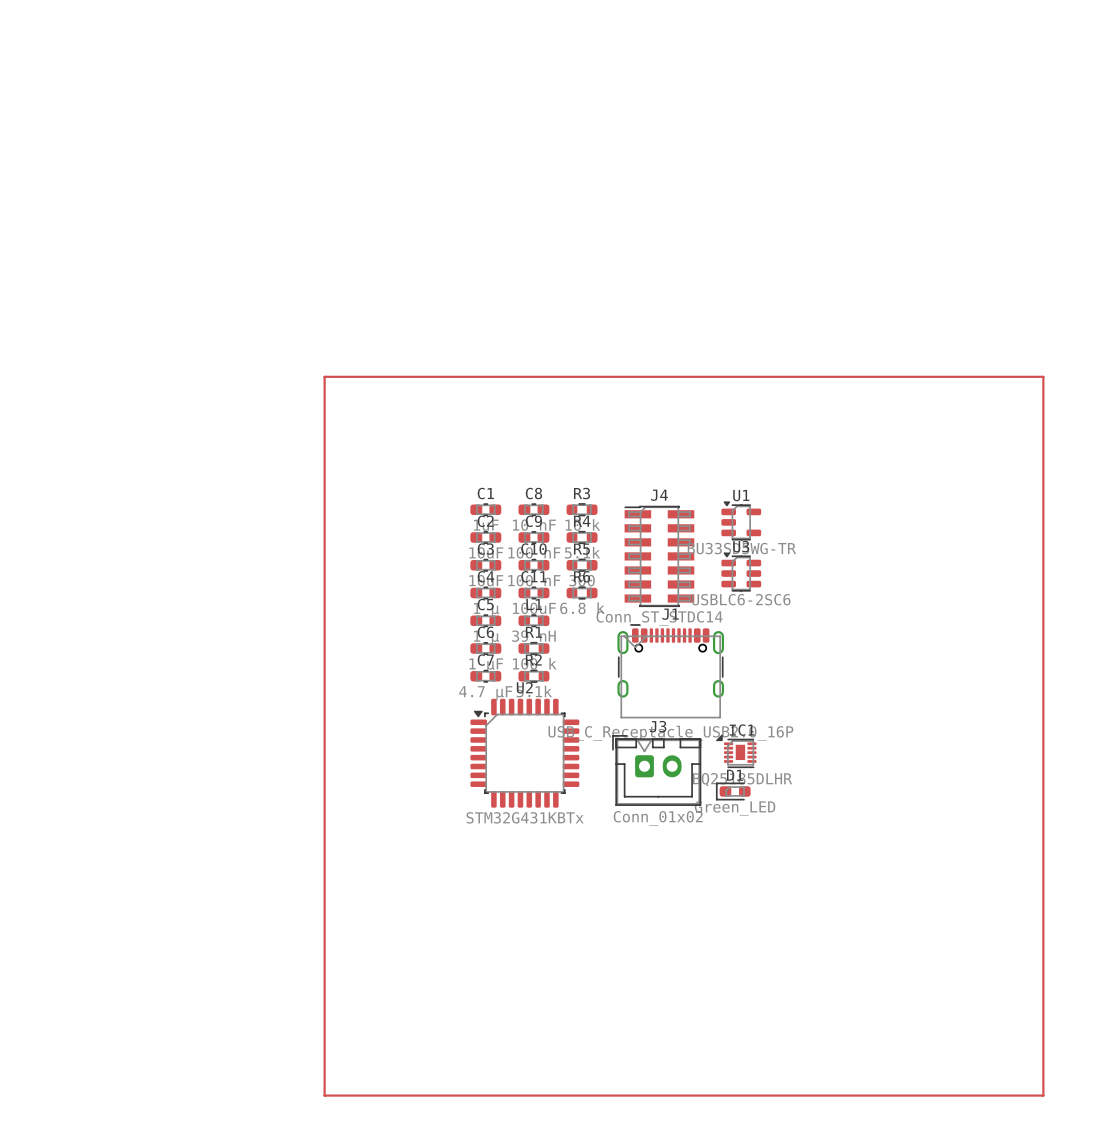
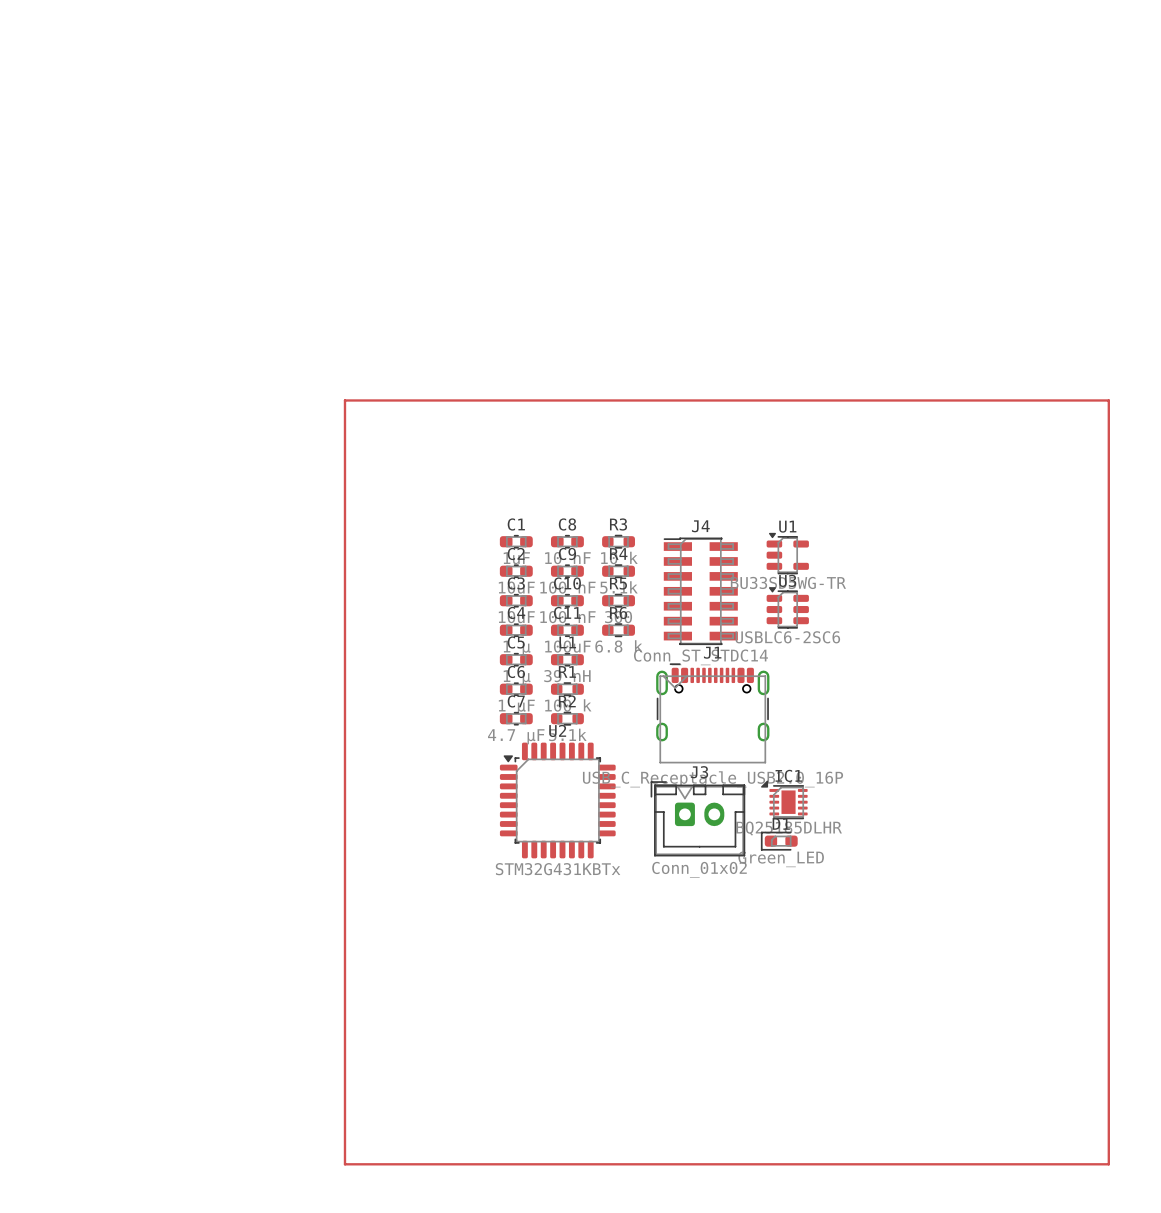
IC1 footprint: [716, 734, 757, 768] -> [761, 780, 808, 820]

